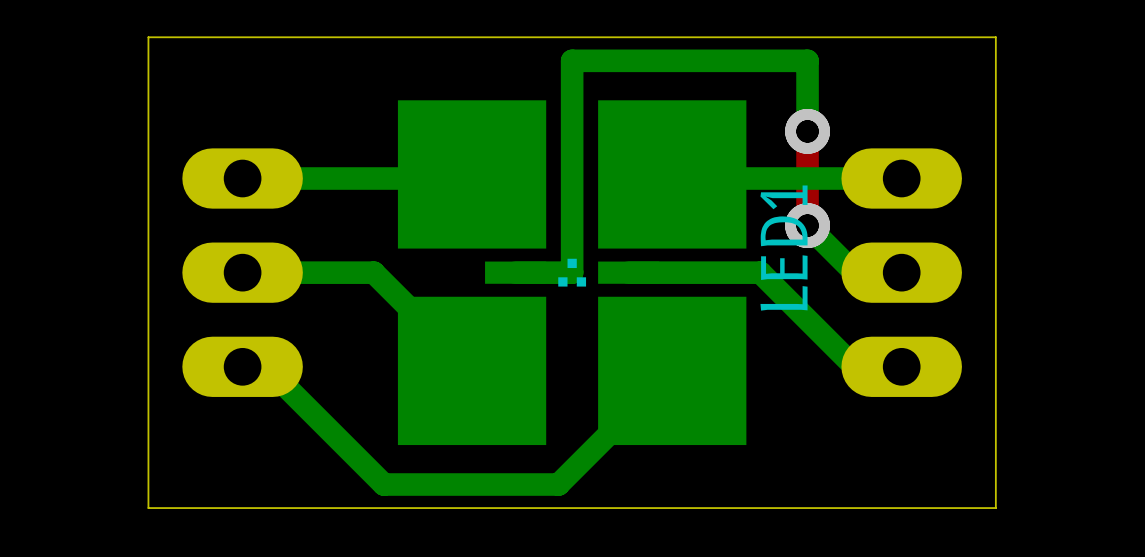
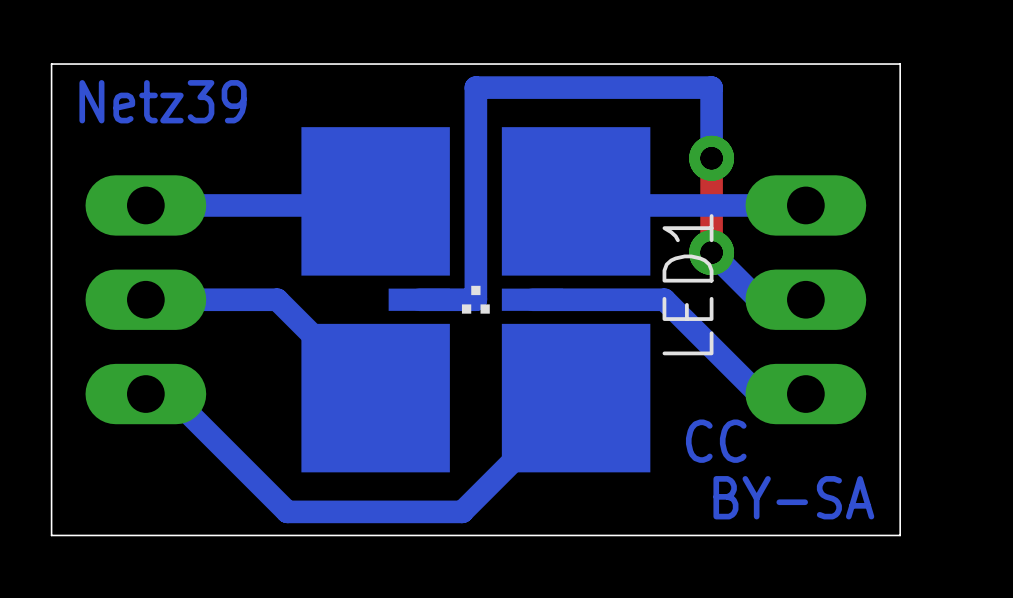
text: none -> Netz39 (163, 101)
text: none -> CC (716, 441)
text: none -> BY-SA (793, 497)

